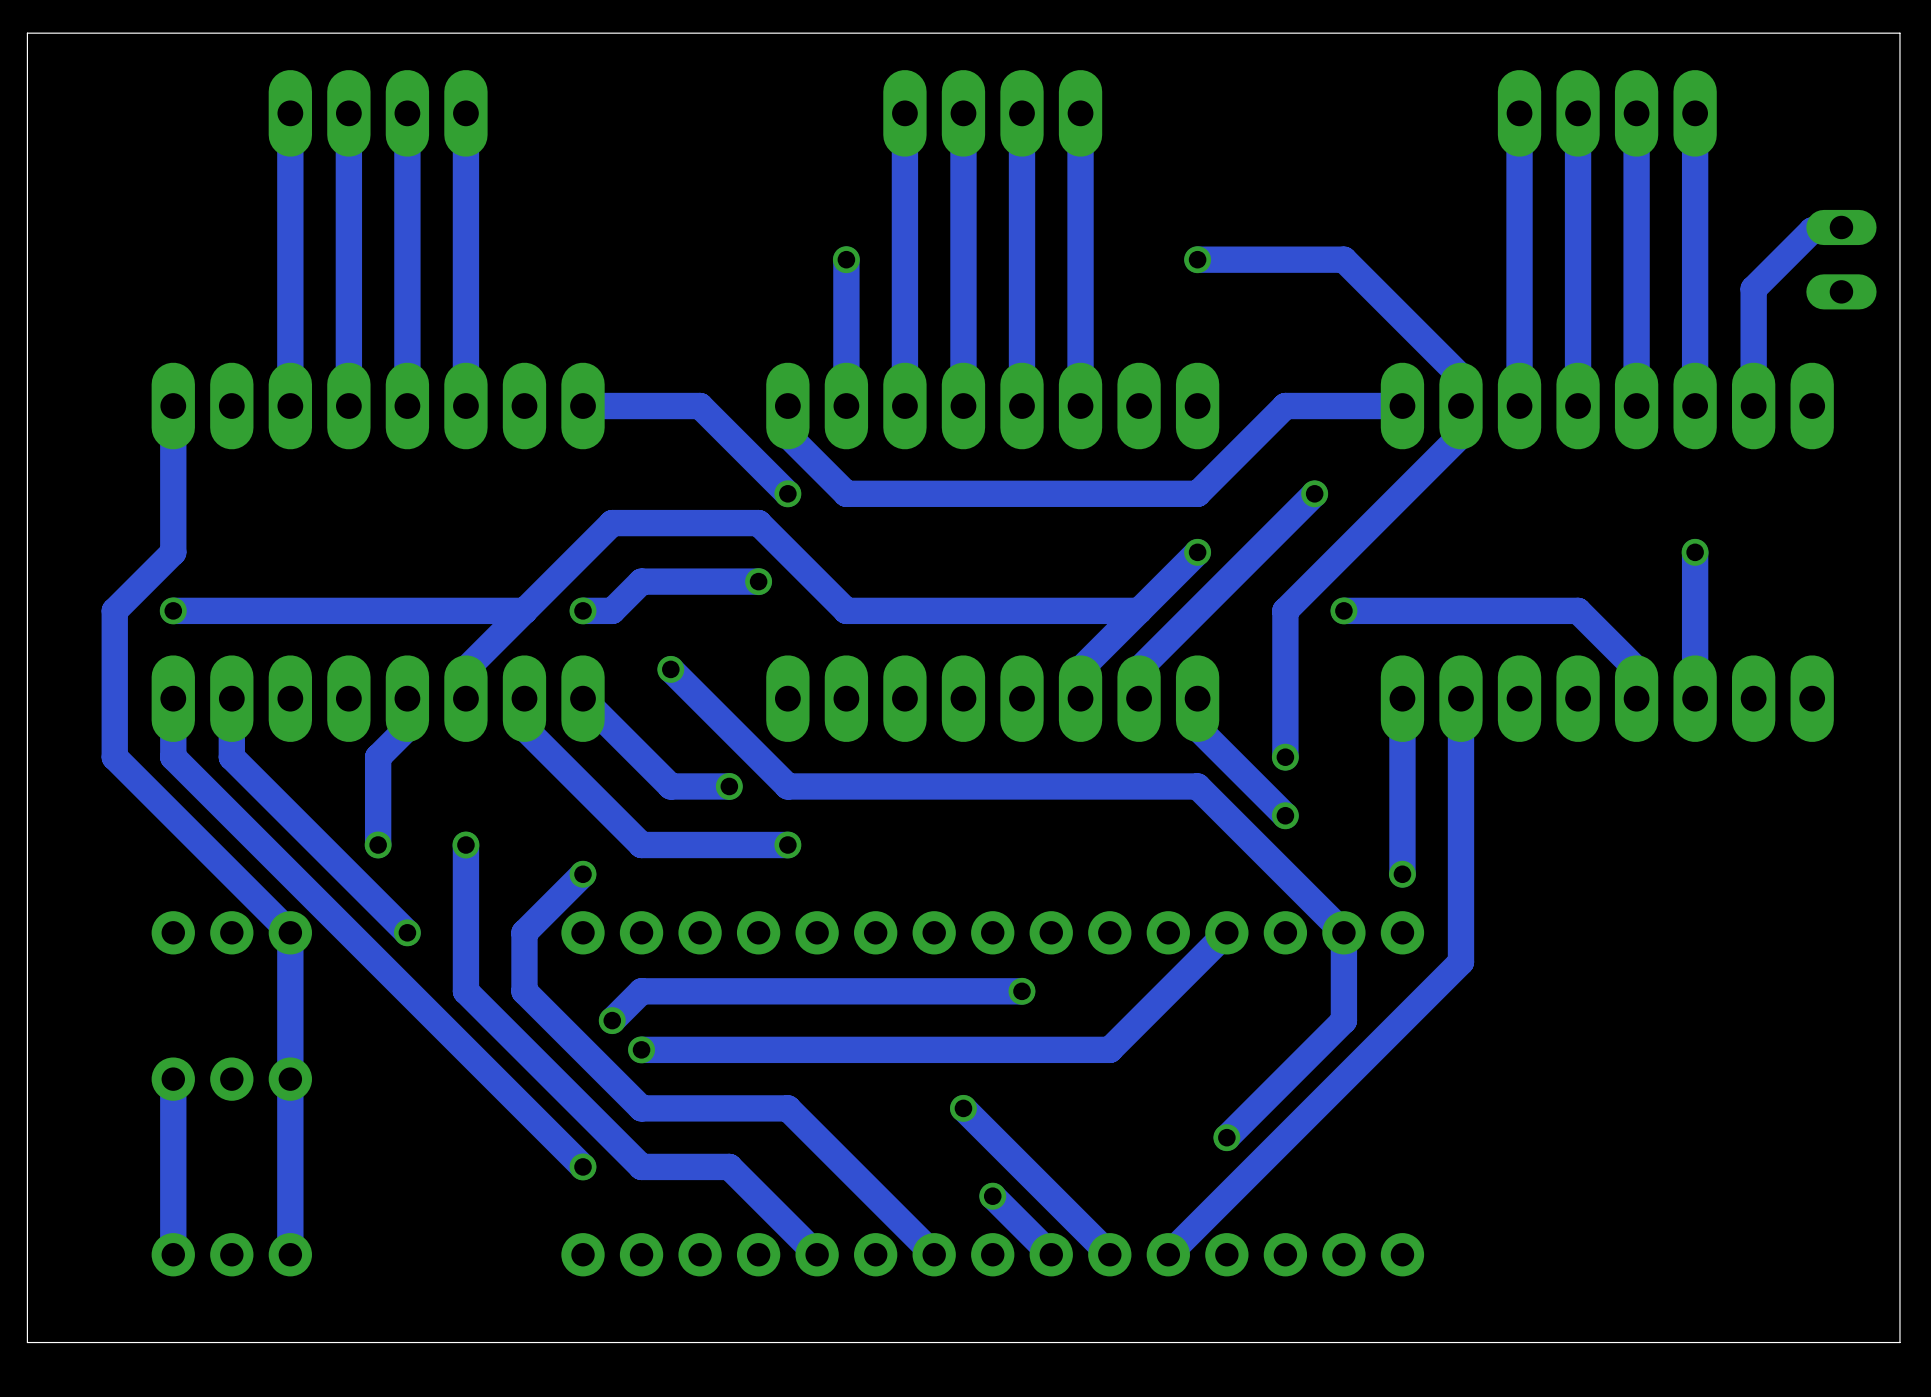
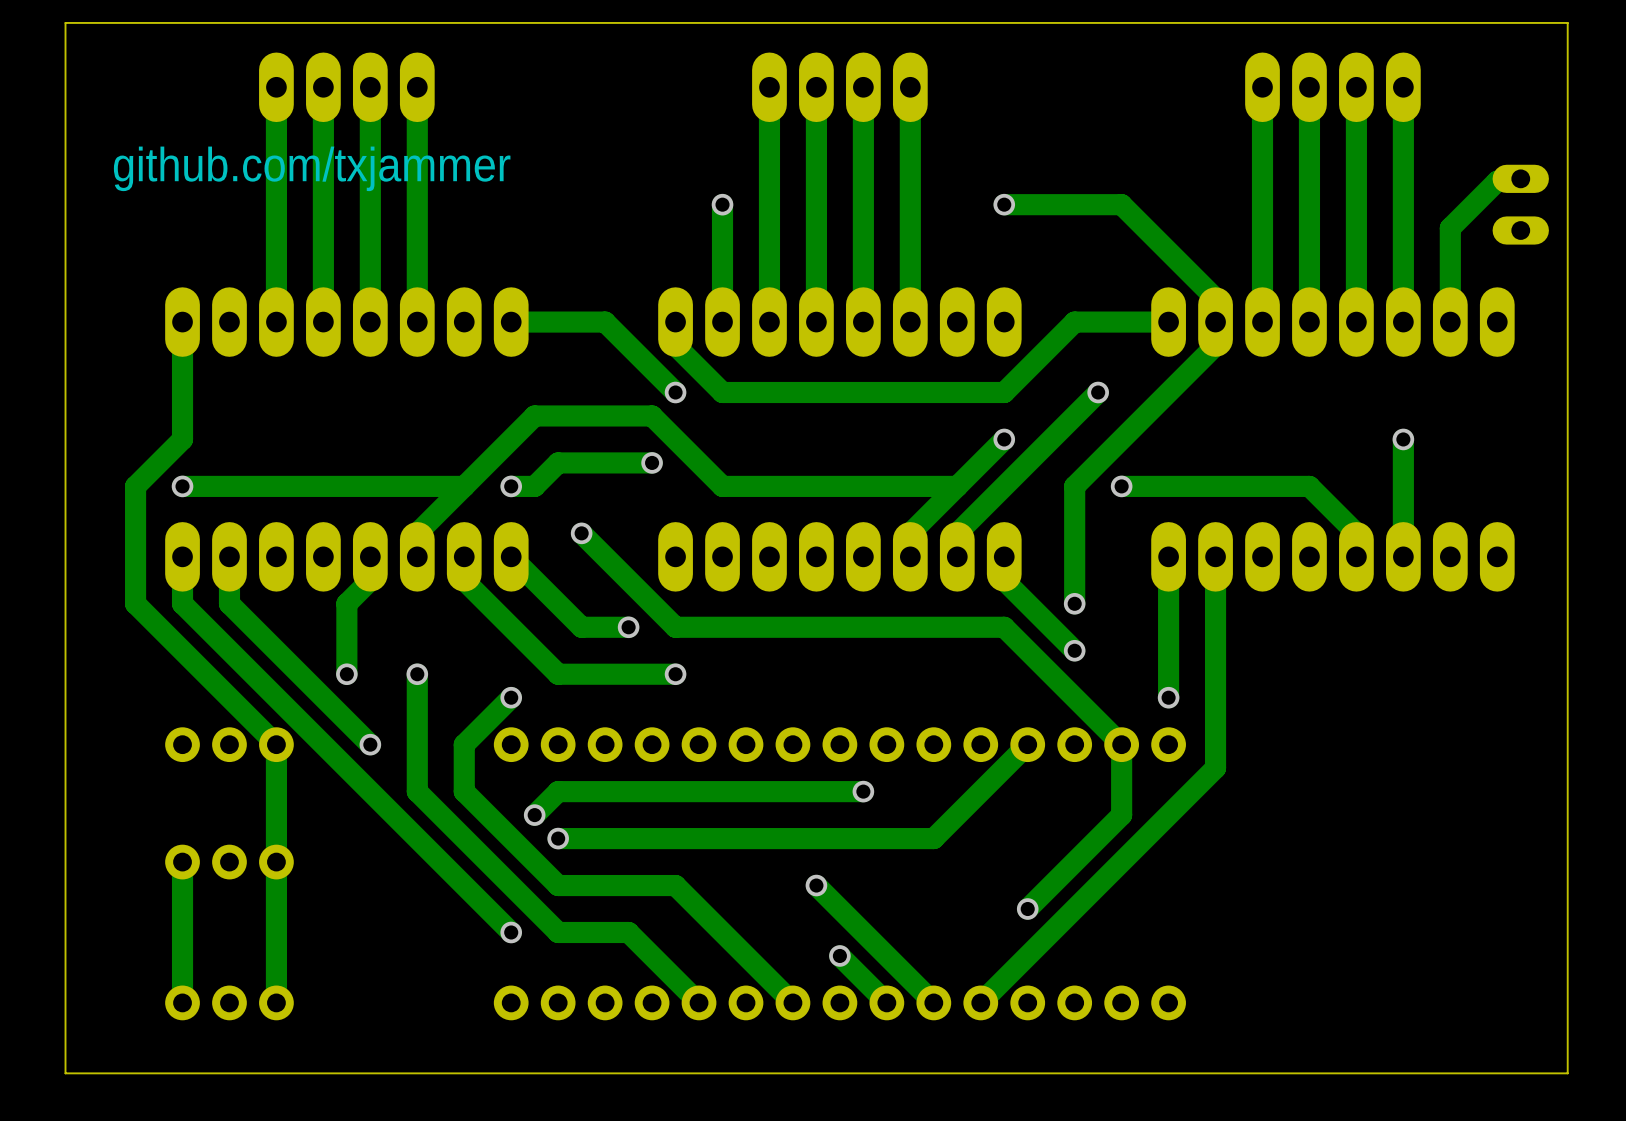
text: none -> github.com/txjammer (312, 168)

